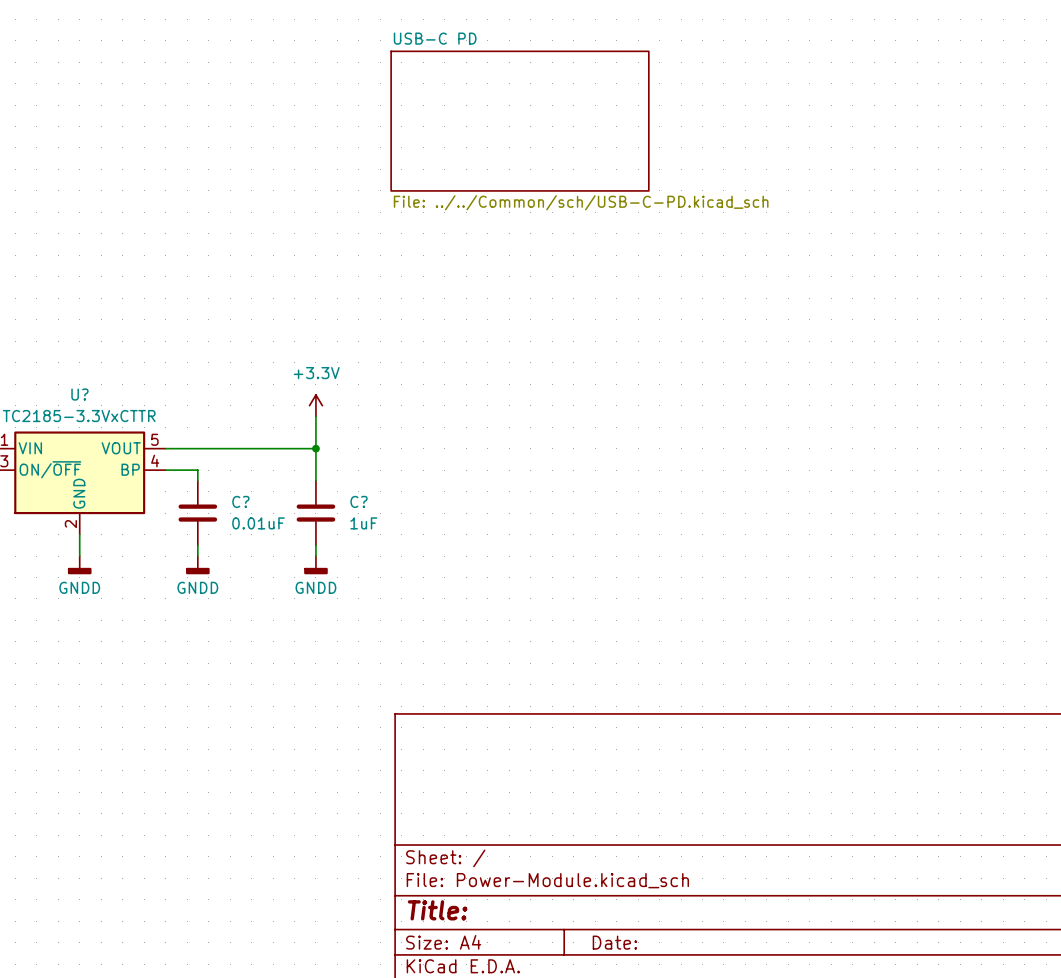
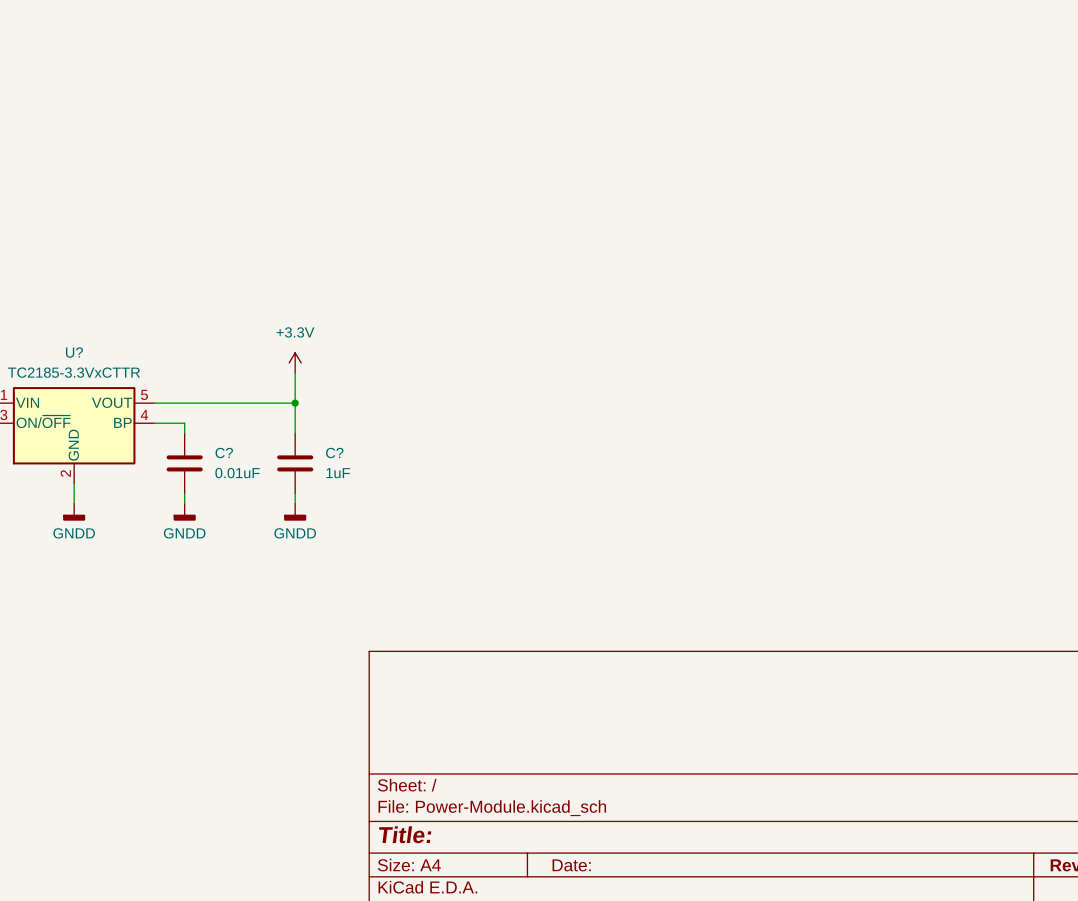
sheet USB-C PD: File: ../../Common/sch/USB-C-PD.kicad_sch (519, 121) -> none

